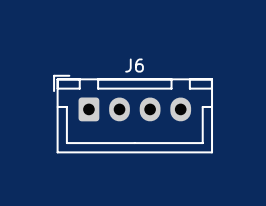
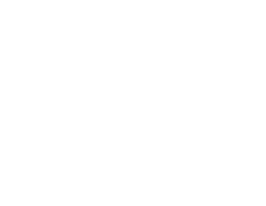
J6: (133, 114) -> none

